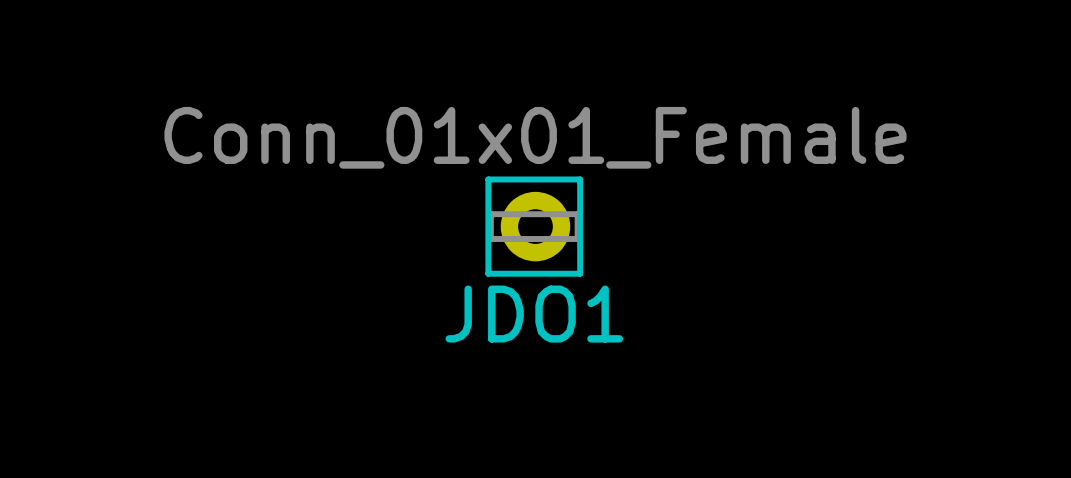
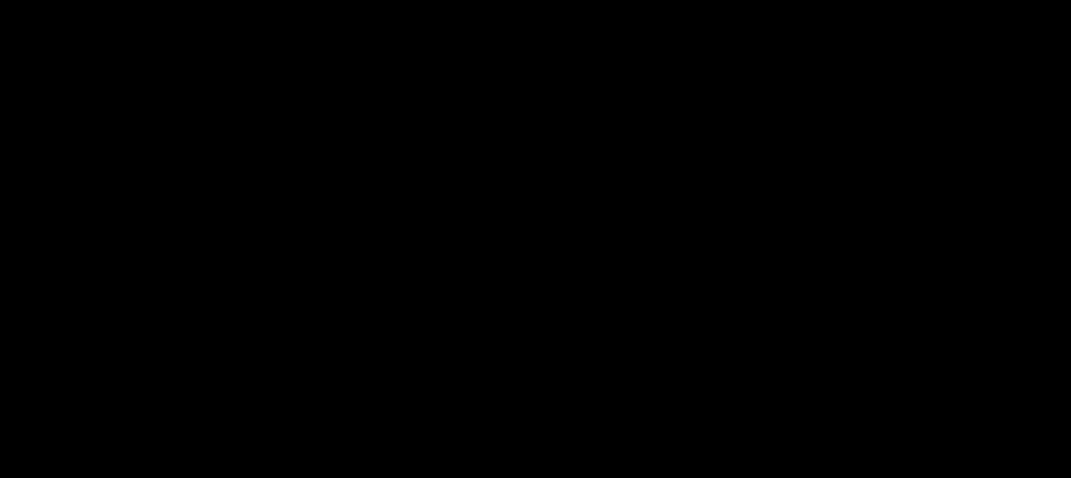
JDO1: Conn_01x01_Female (534, 226) -> none

